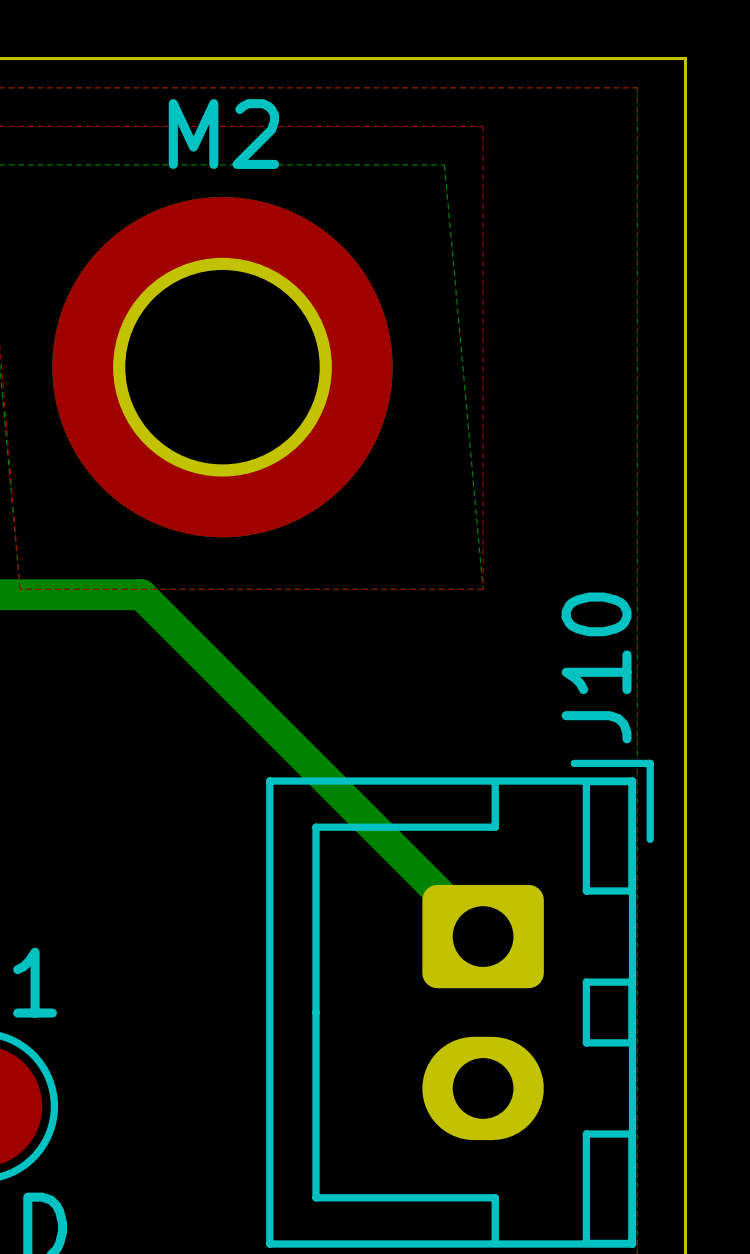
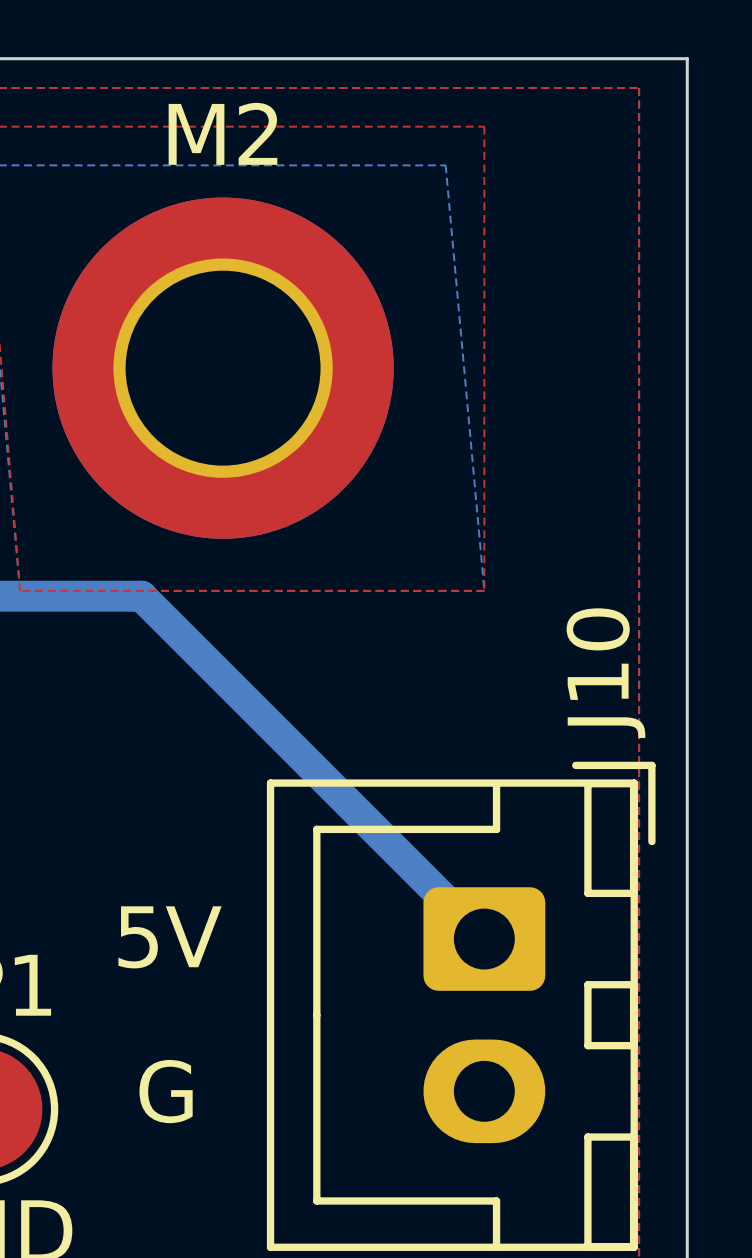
text: none -> 5V (170, 937)
text: none -> G (166, 1091)

